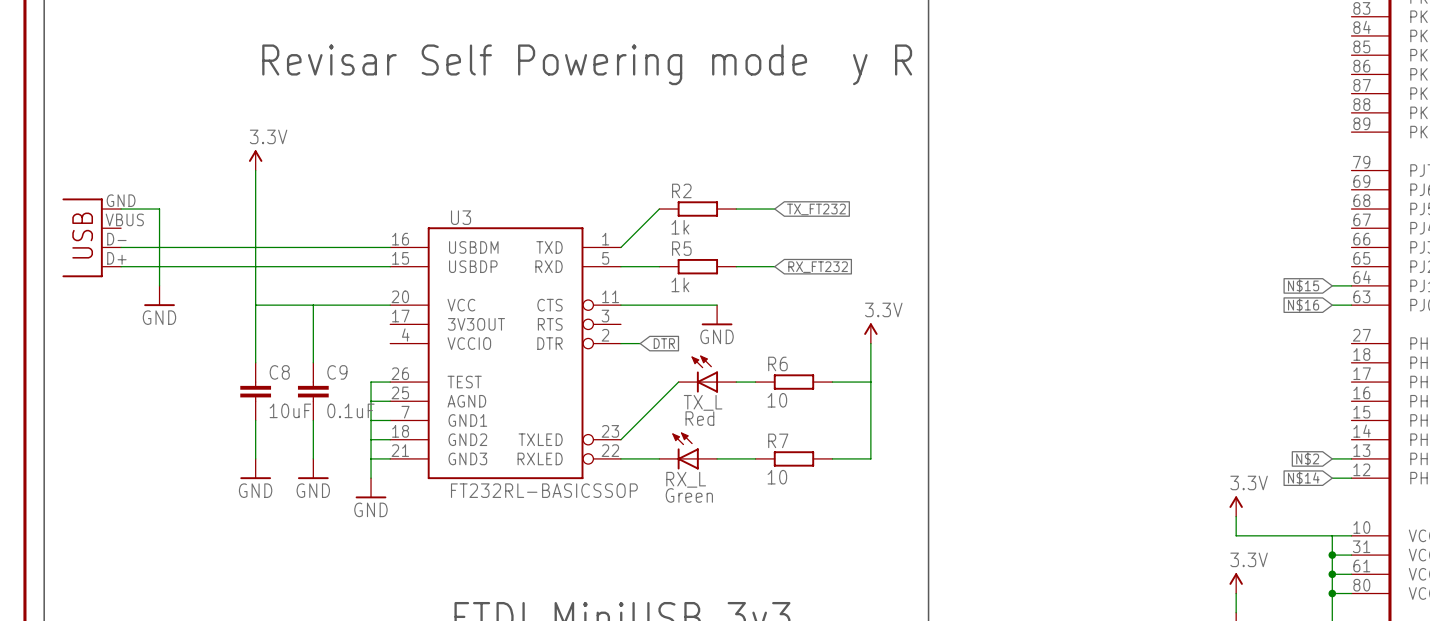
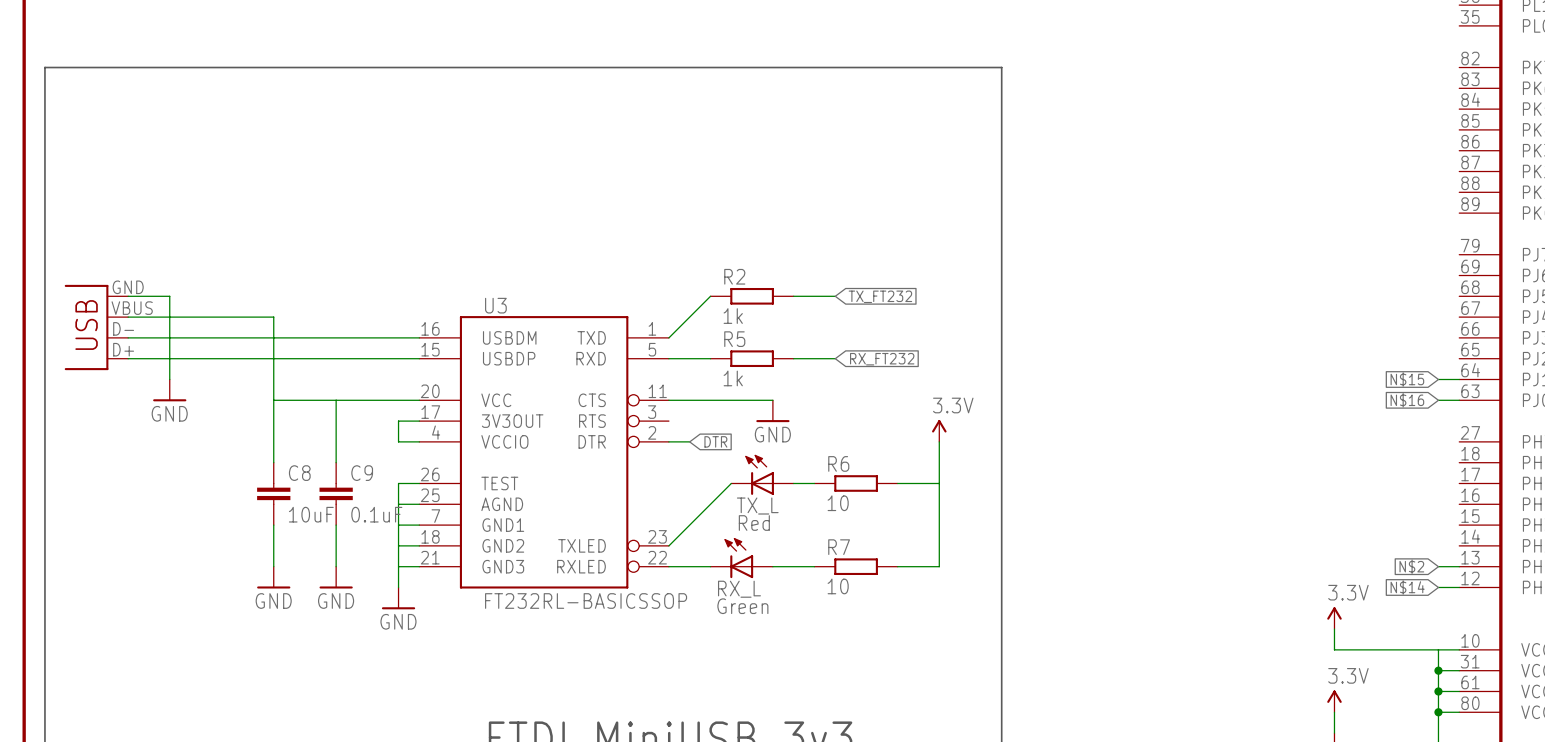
text: Revisar Self Powering mode y R (587, 64) -> none
power symbol: 3.3V (255, 160) -> none
wire: (255, 170) (255, 228) -> (128, 317) (273, 317)
wire: none -> (419, 421) (398, 421) (398, 441) (419, 441)

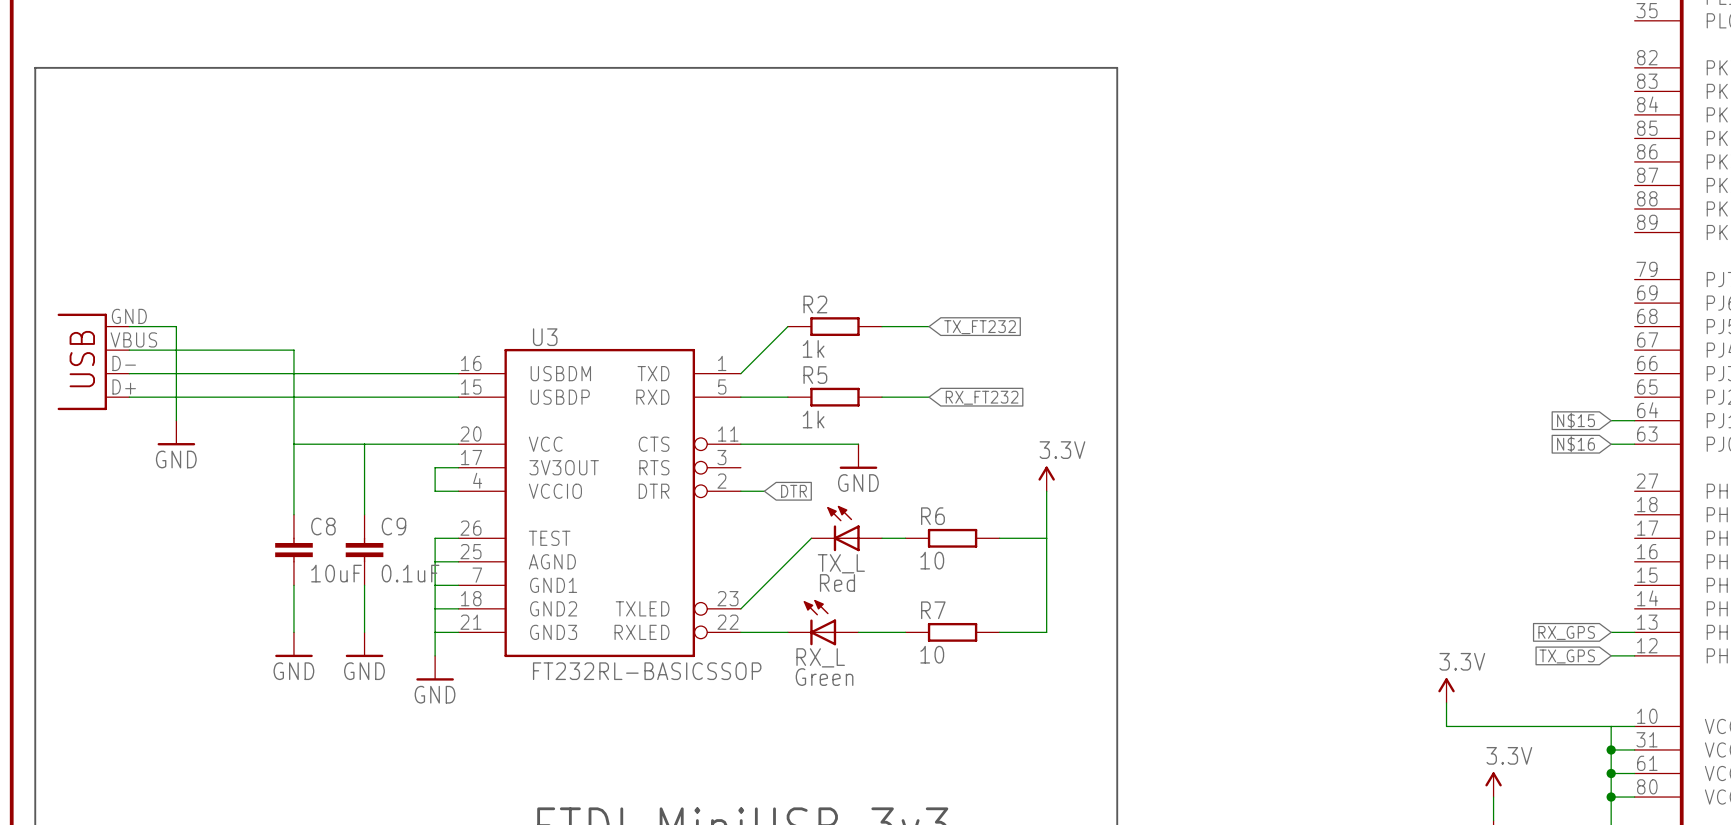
global label: N$2 (1411, 566) -> RX_GPS (1566, 632)
global label: N$14 (1407, 587) -> TX_GPS (1567, 656)
power symbol position: 3.3V (1334, 618) -> 3.3V (1446, 690)
wire: (1334, 629) (1334, 649) -> (1446, 702) (1446, 726) (1493, 726)

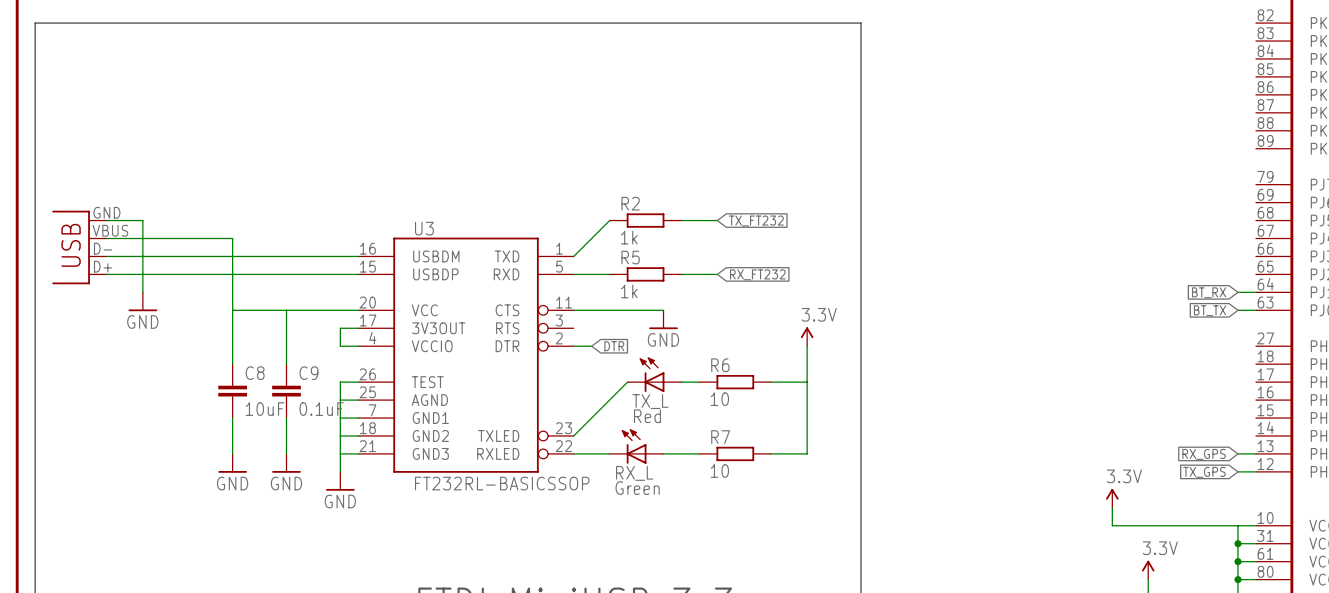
global label: N$15 (1576, 420) -> BT_RX (1209, 292)
global label: N$16 (1576, 444) -> BT_TX (1210, 310)

